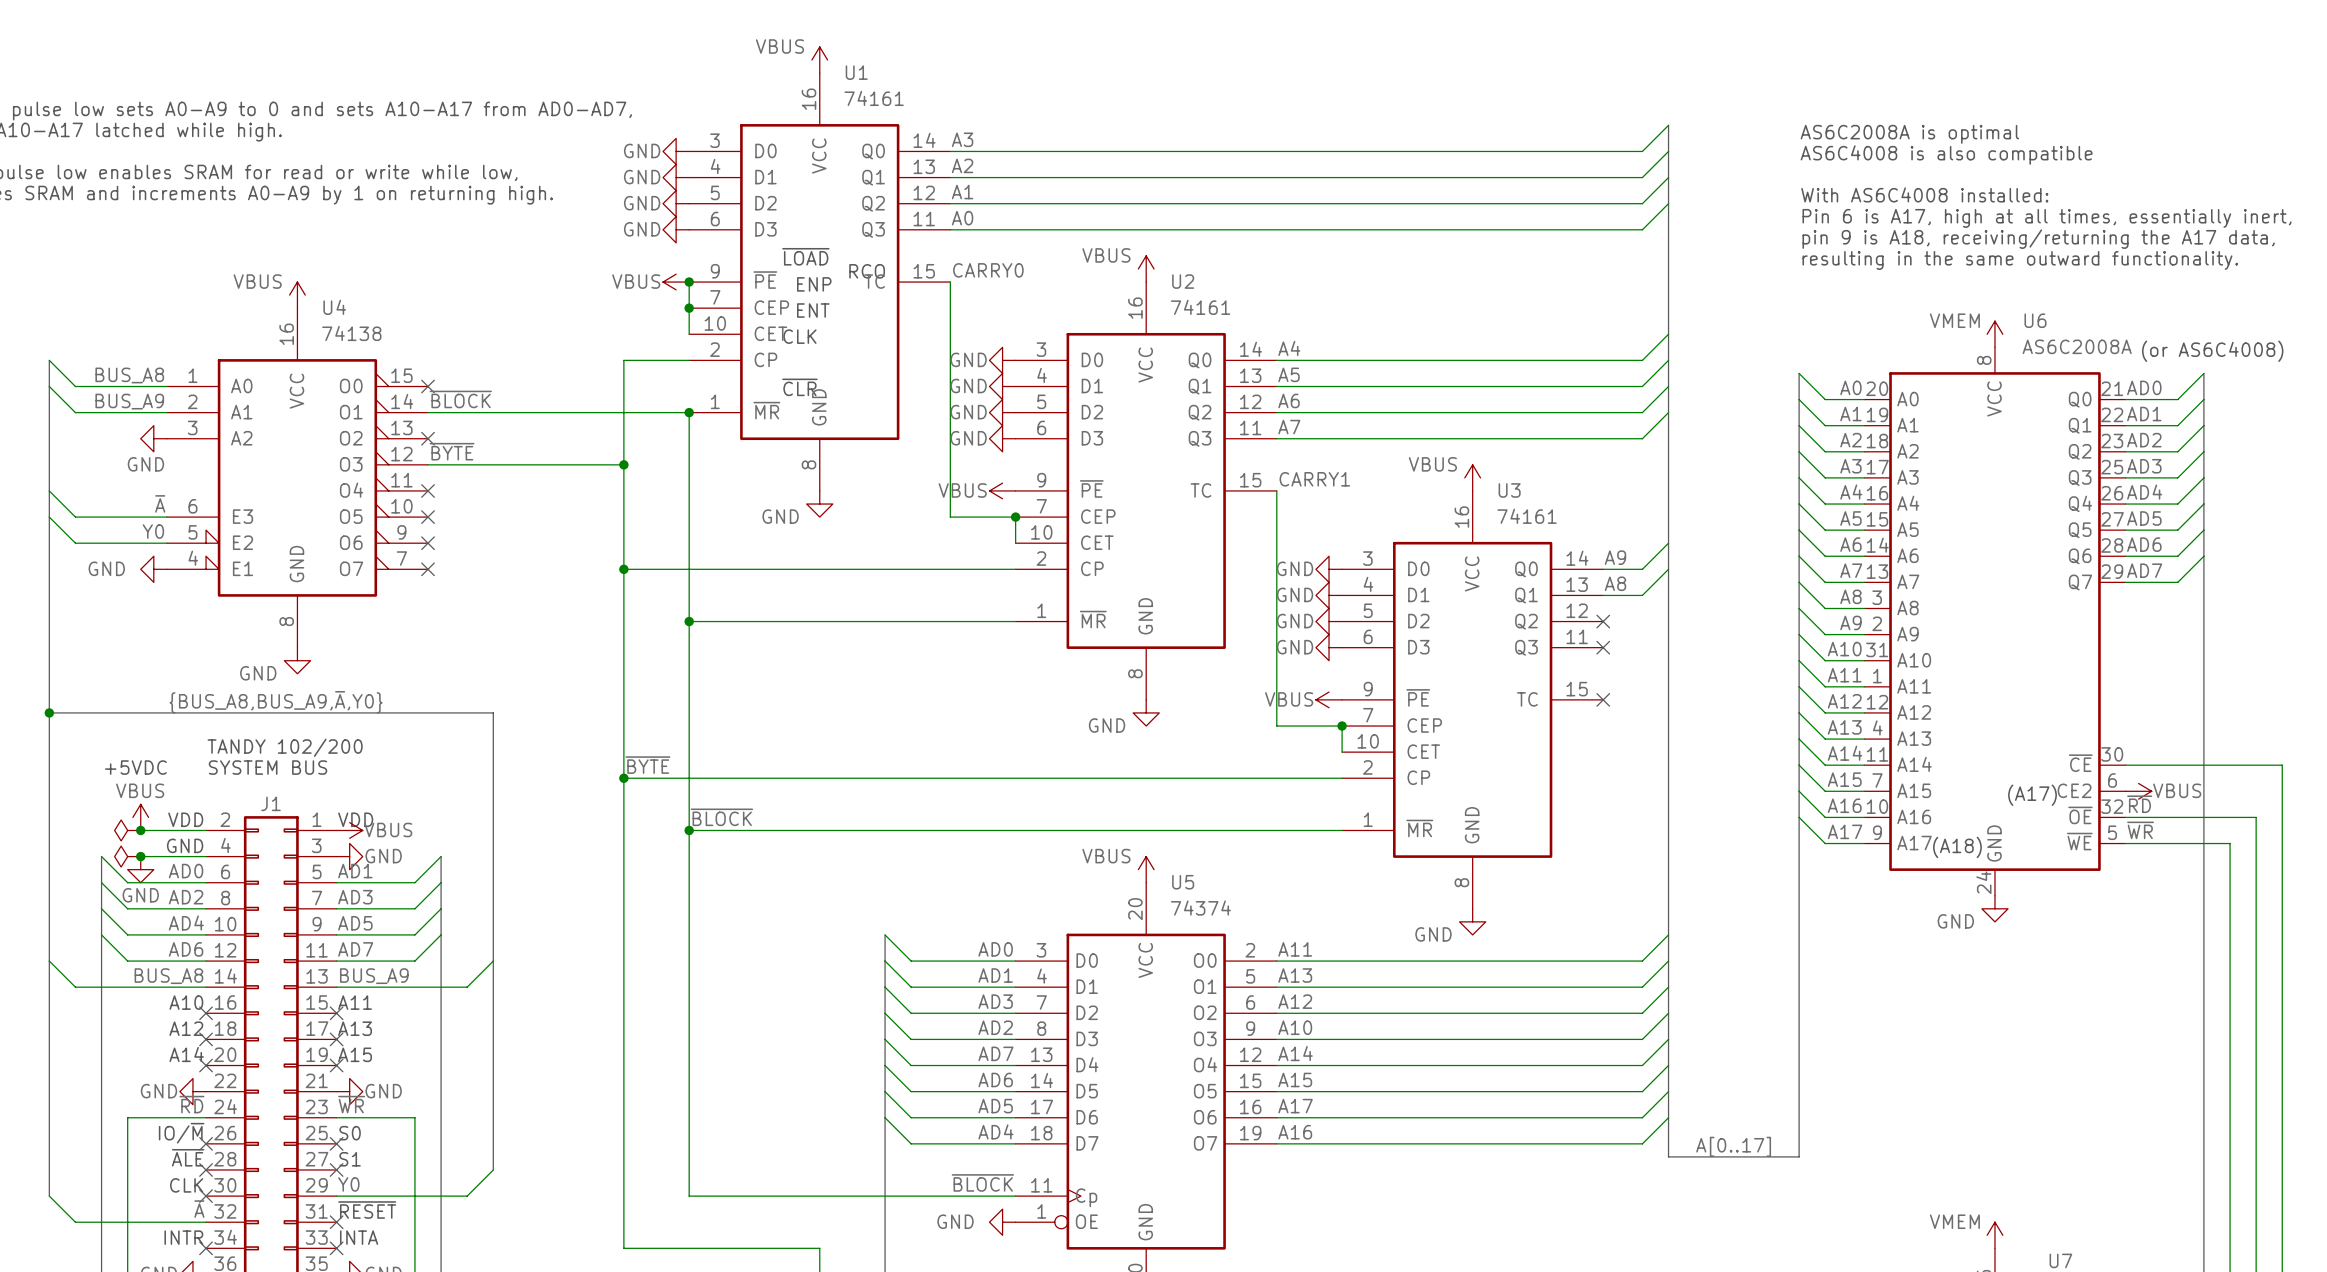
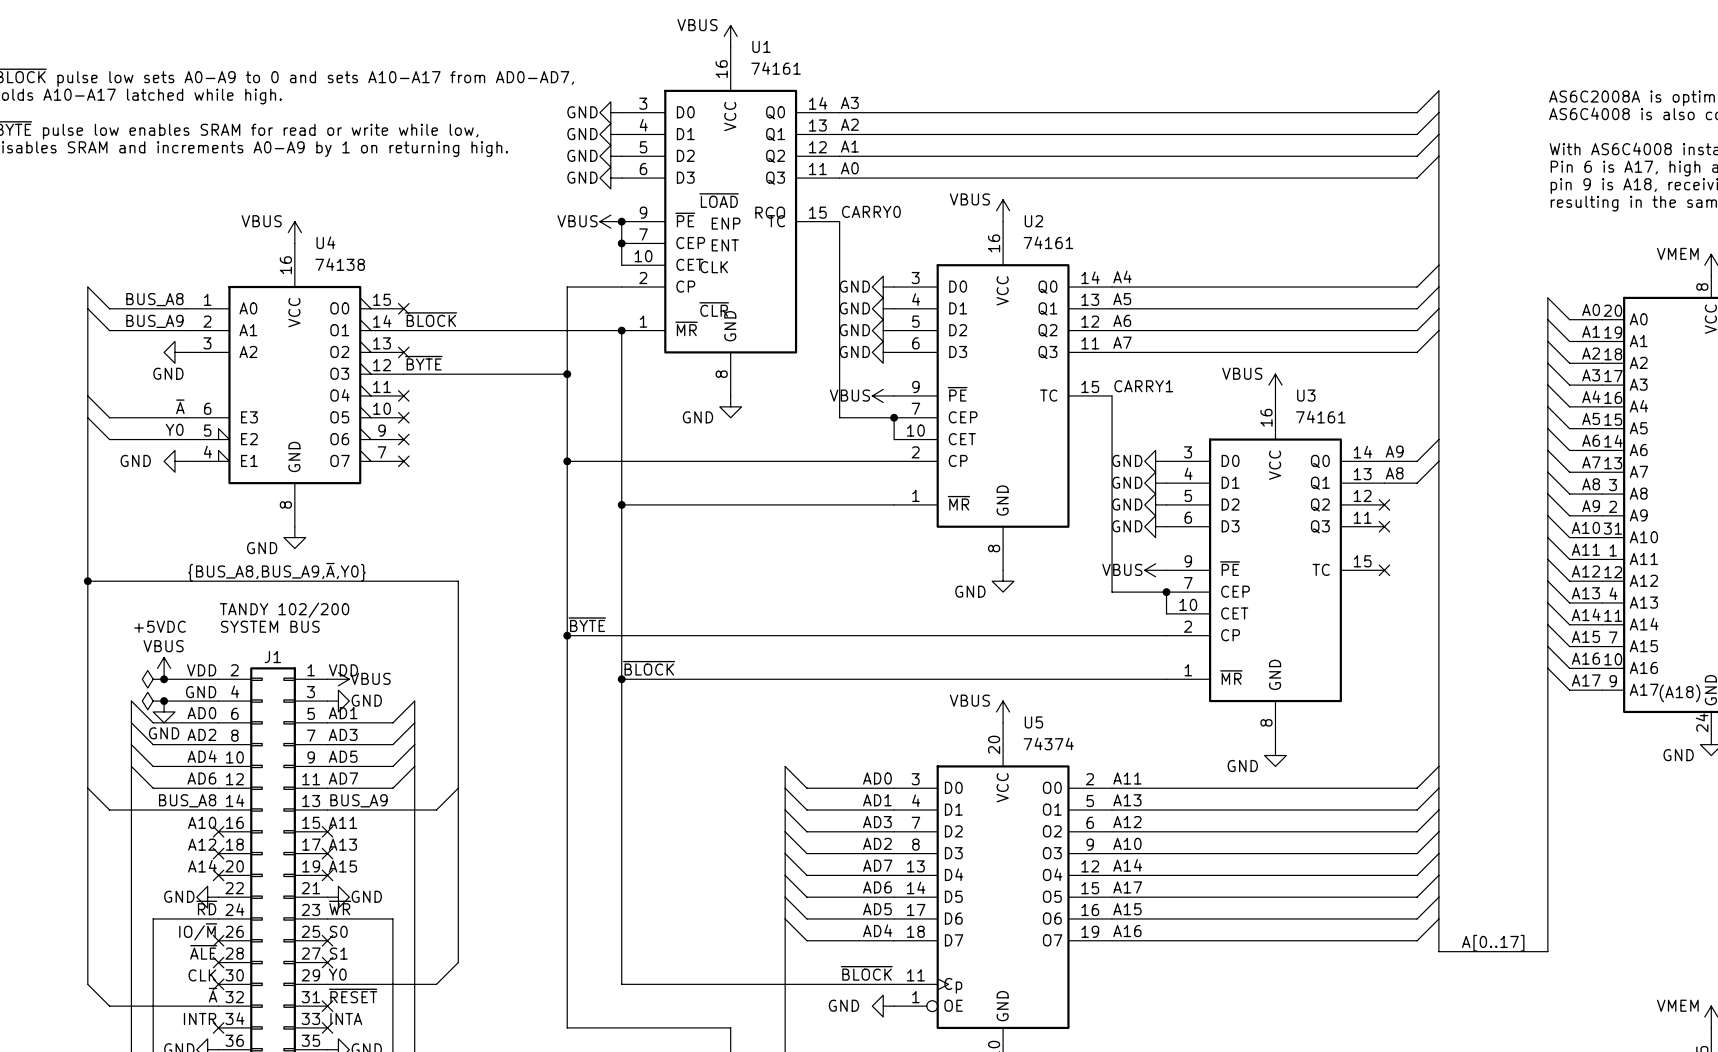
label: A15 (1295, 1079) -> A17 (1127, 887)
label: A17 (1295, 1106) -> A15 (1127, 909)

